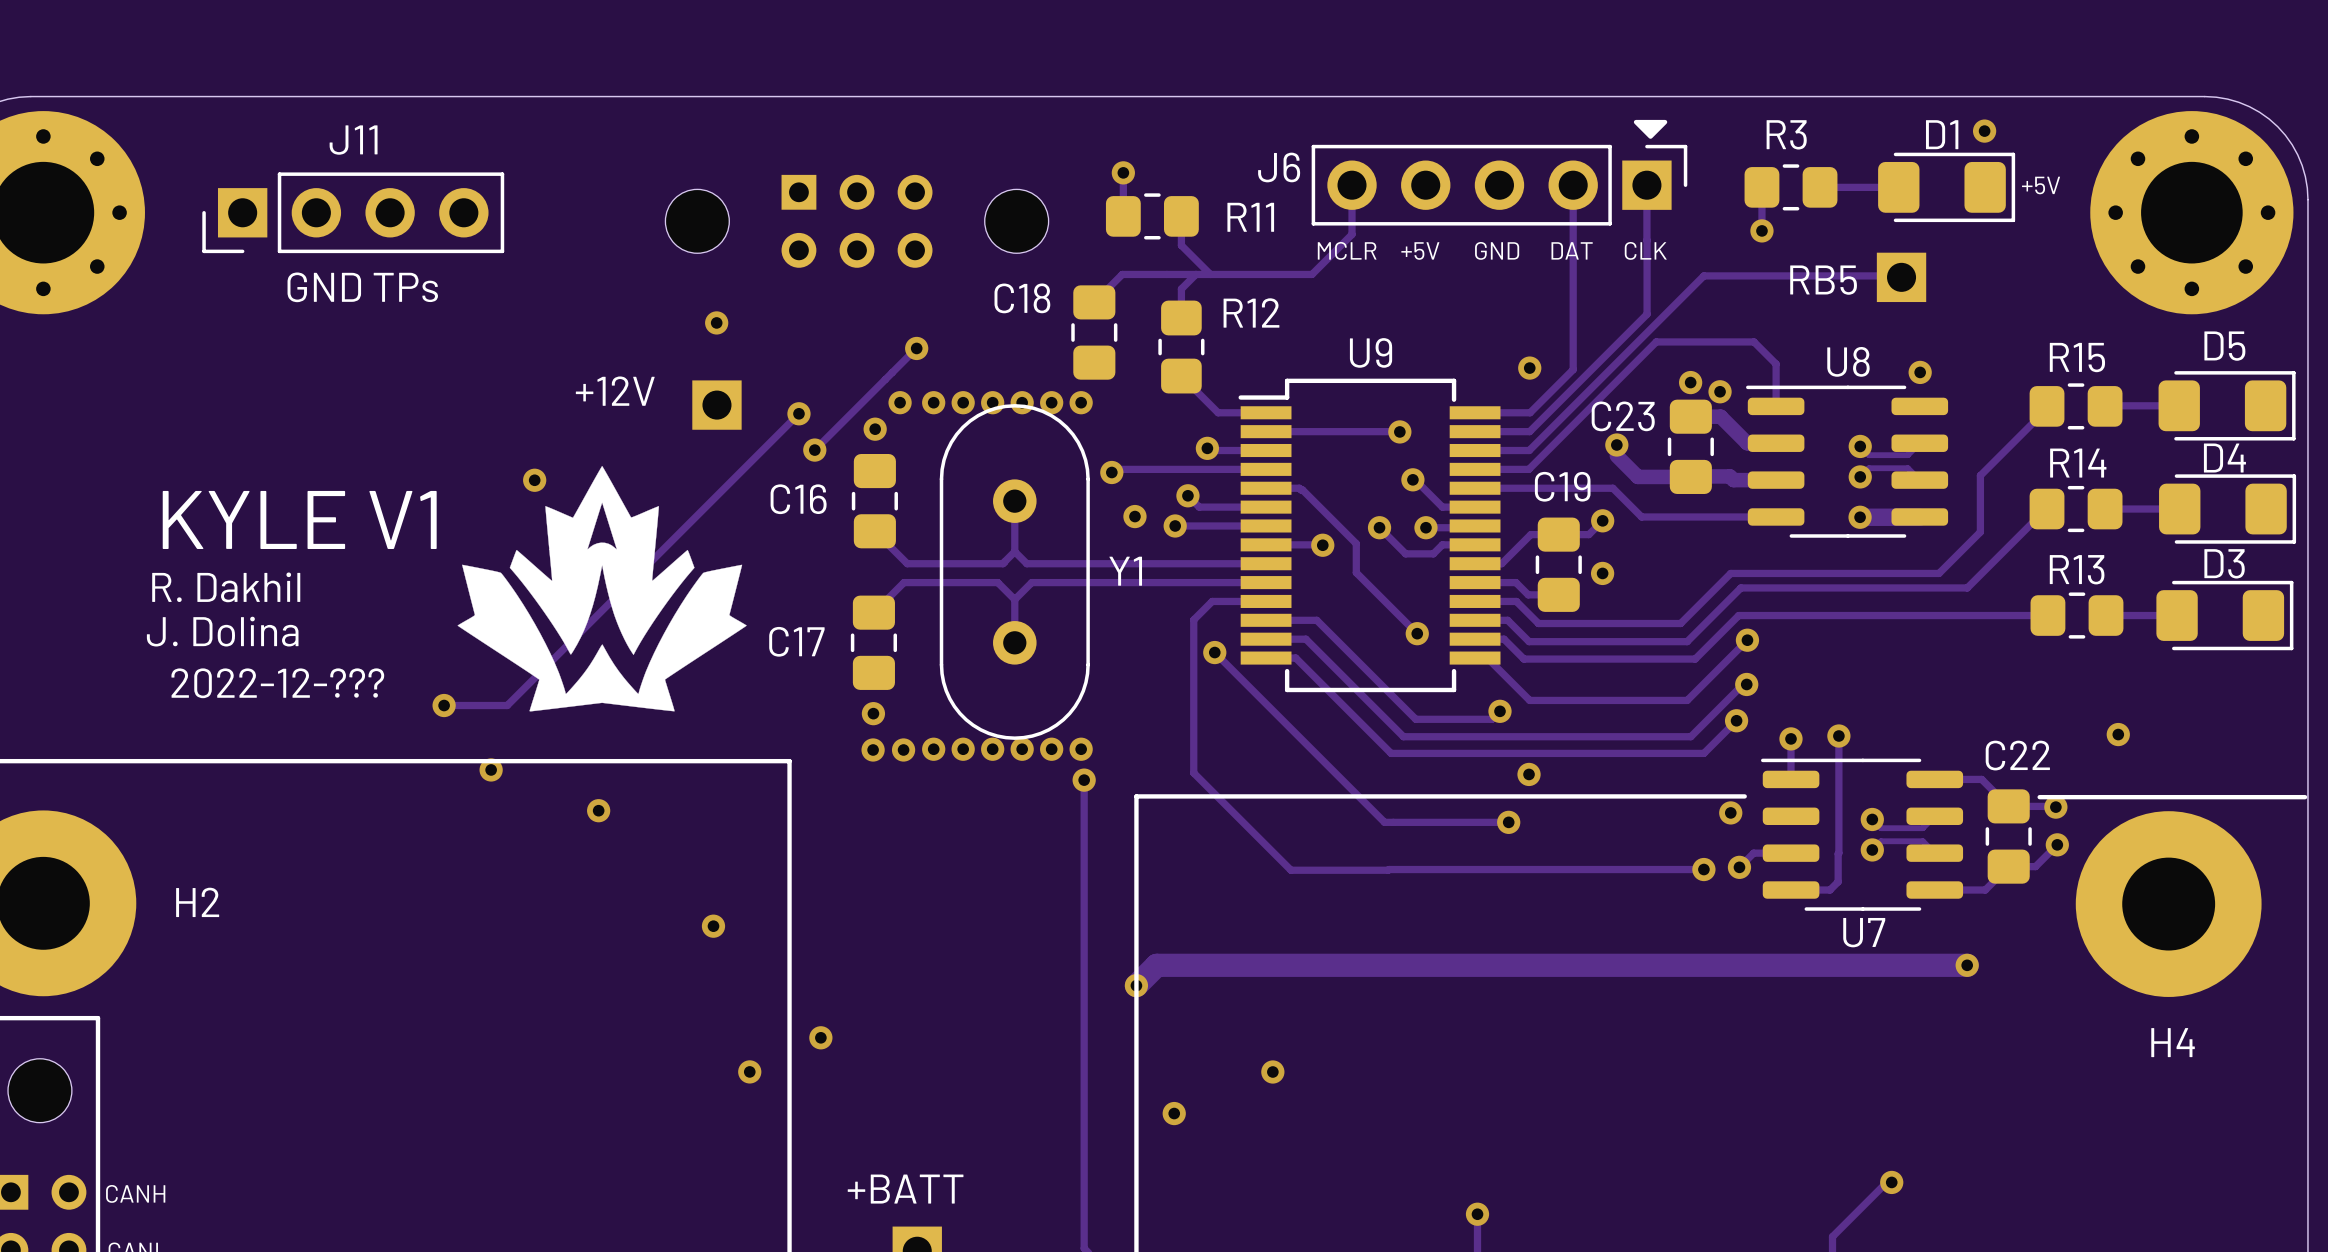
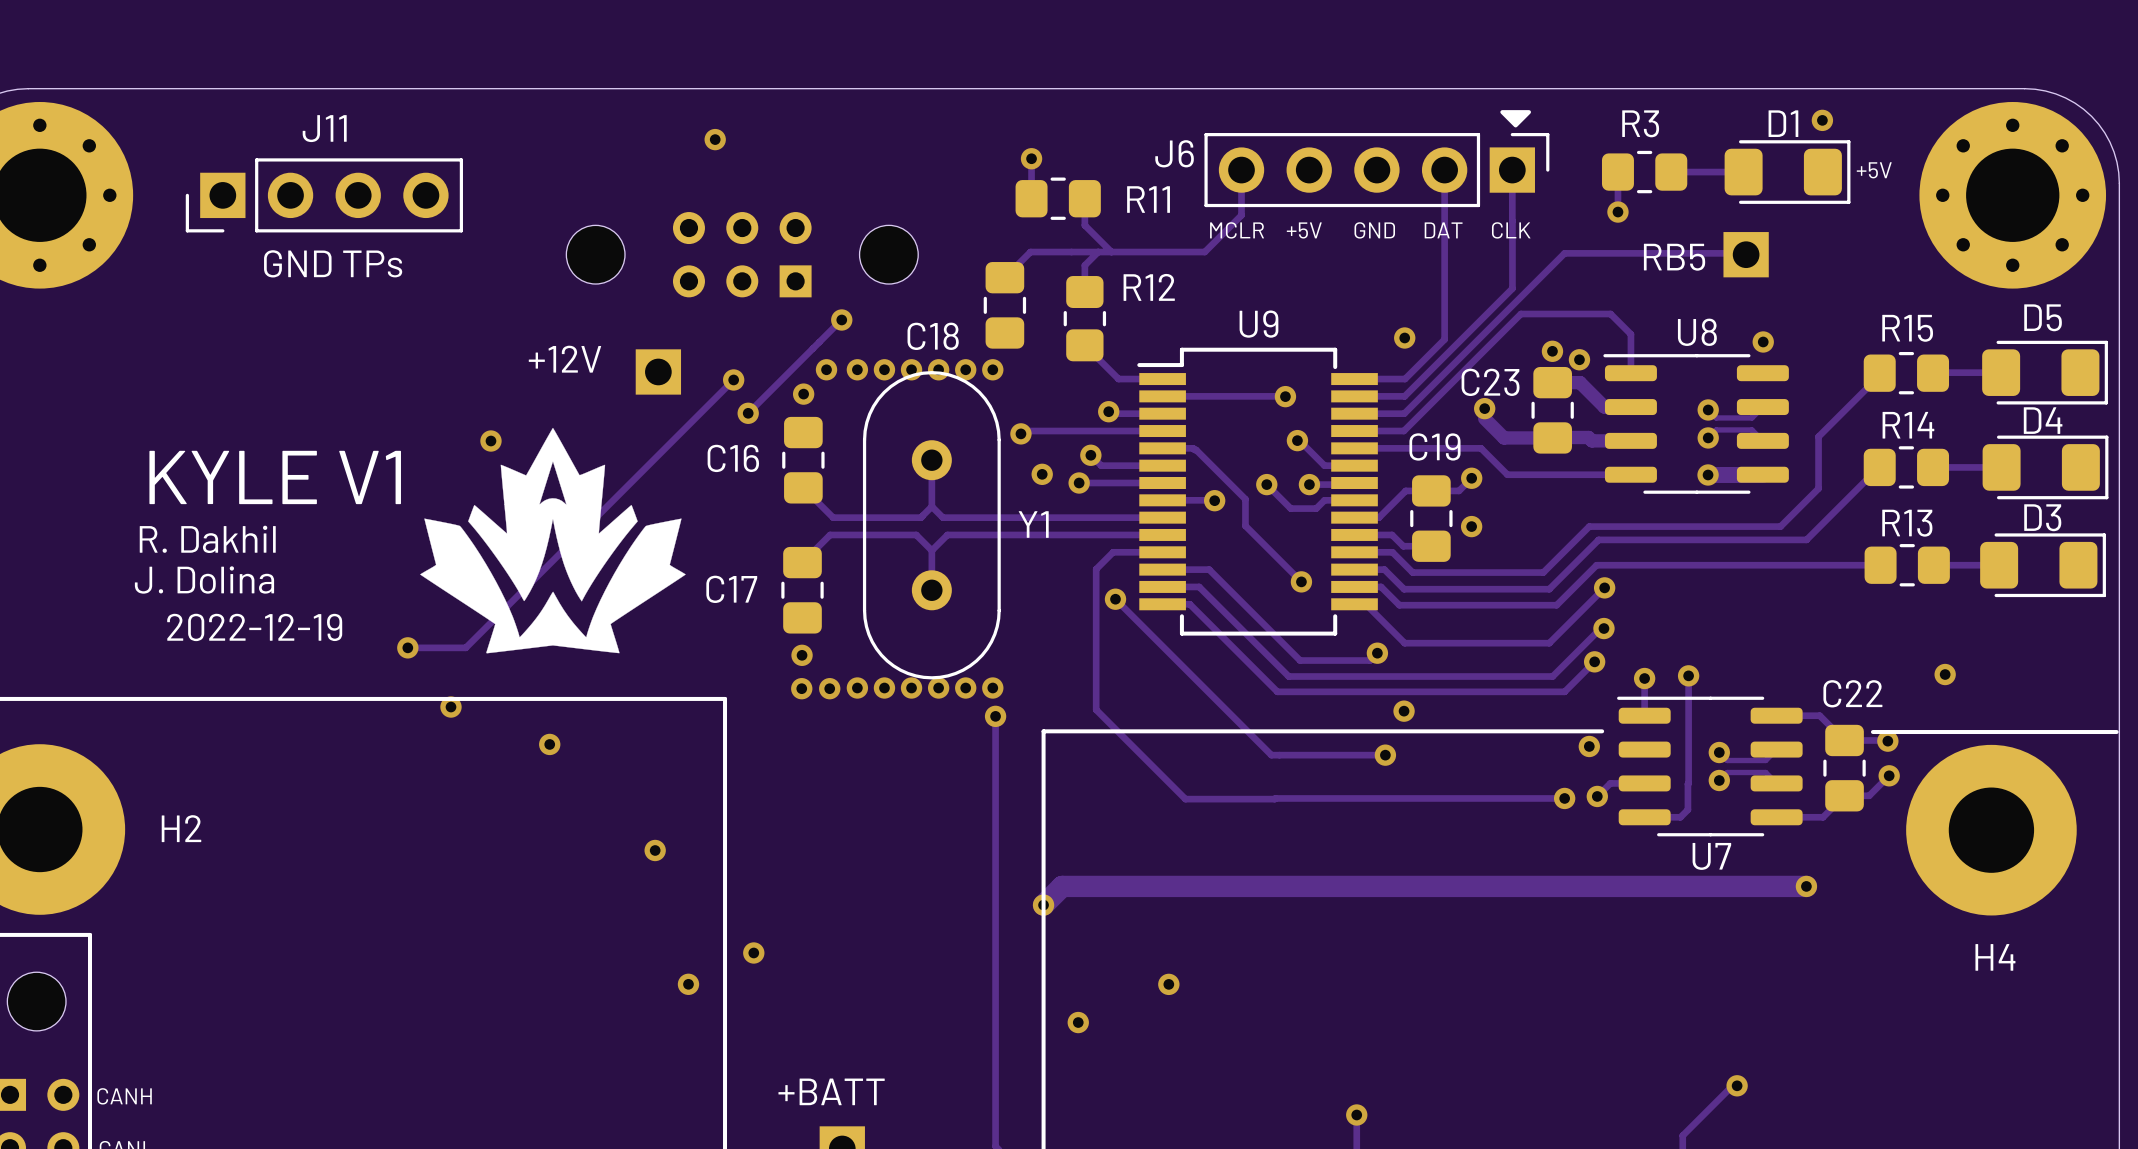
via: none -> (715, 139)
part rotation: 0° (857, 221) -> 180° (742, 254)
C18 name position: C18 (1022, 298) -> C18 (933, 336)
via: (716, 322) -> none
text: 2022-12-??? (277, 683) -> 2022-12-19 (254, 627)

